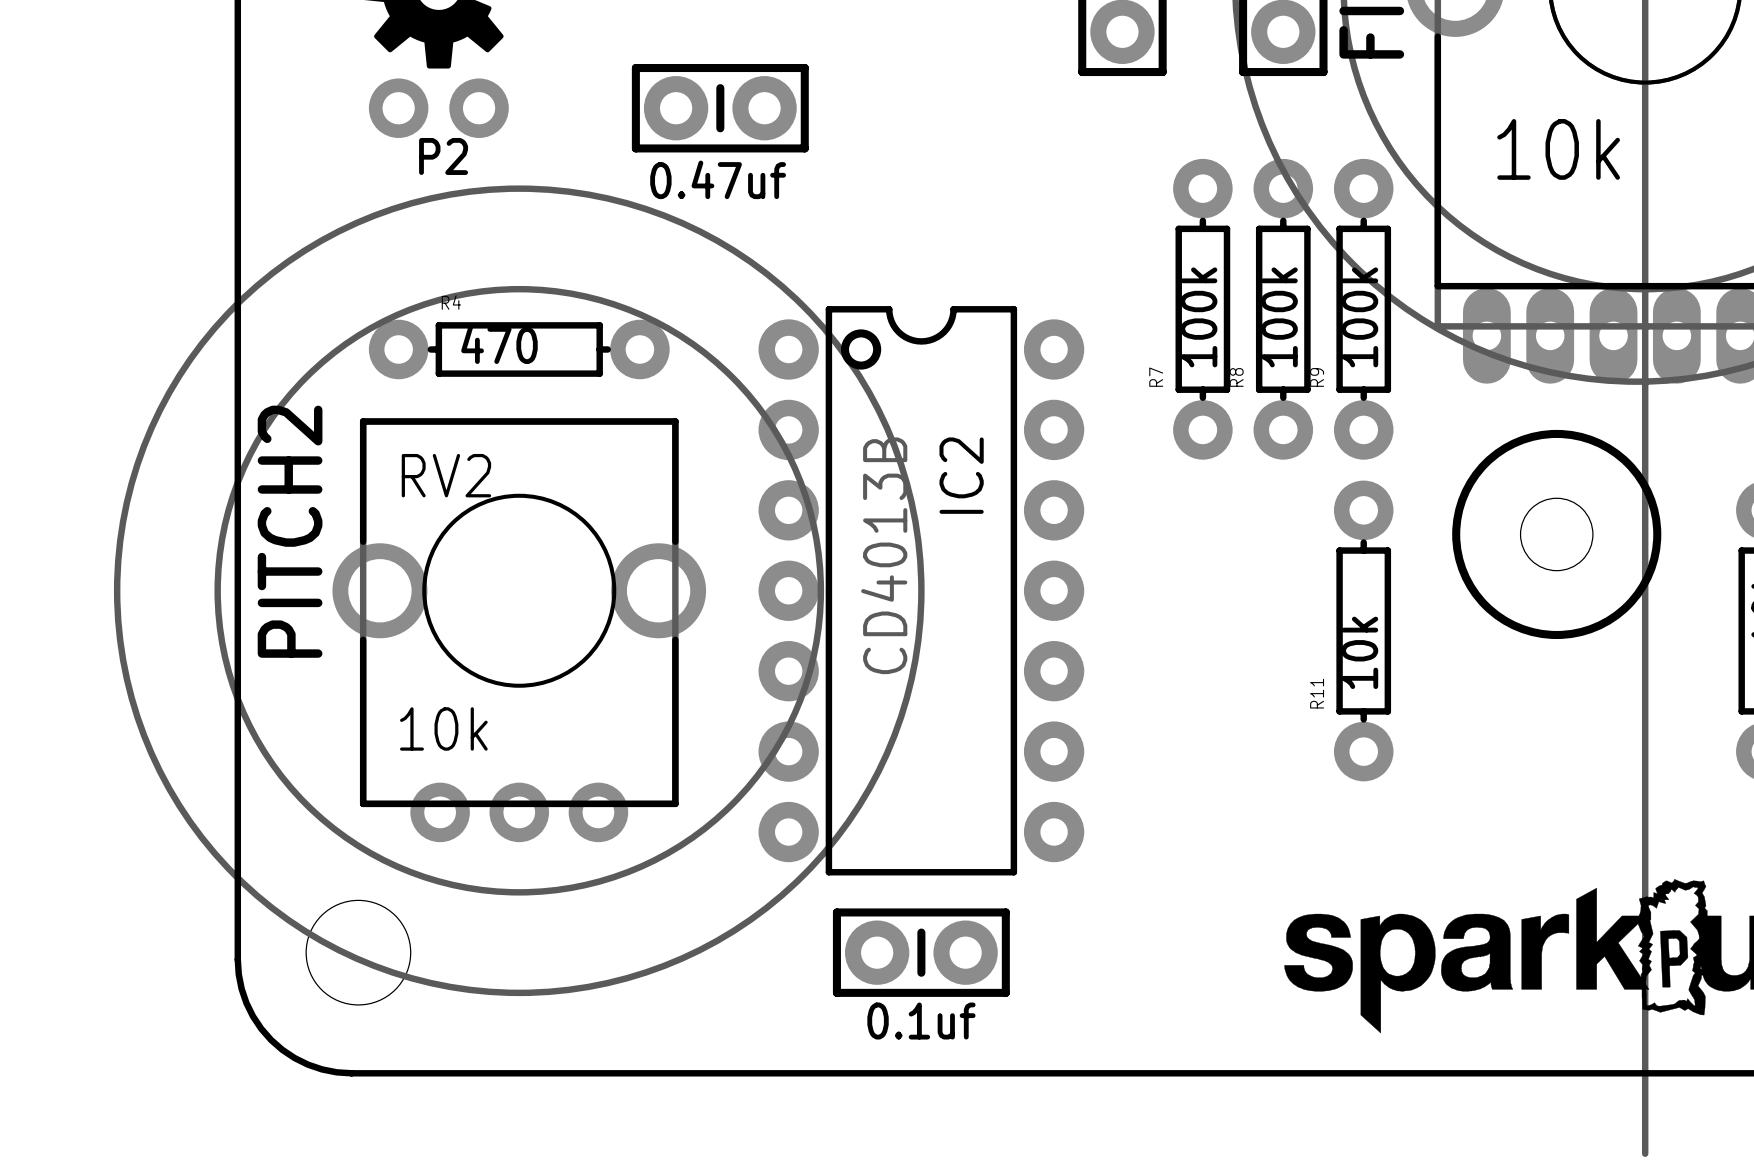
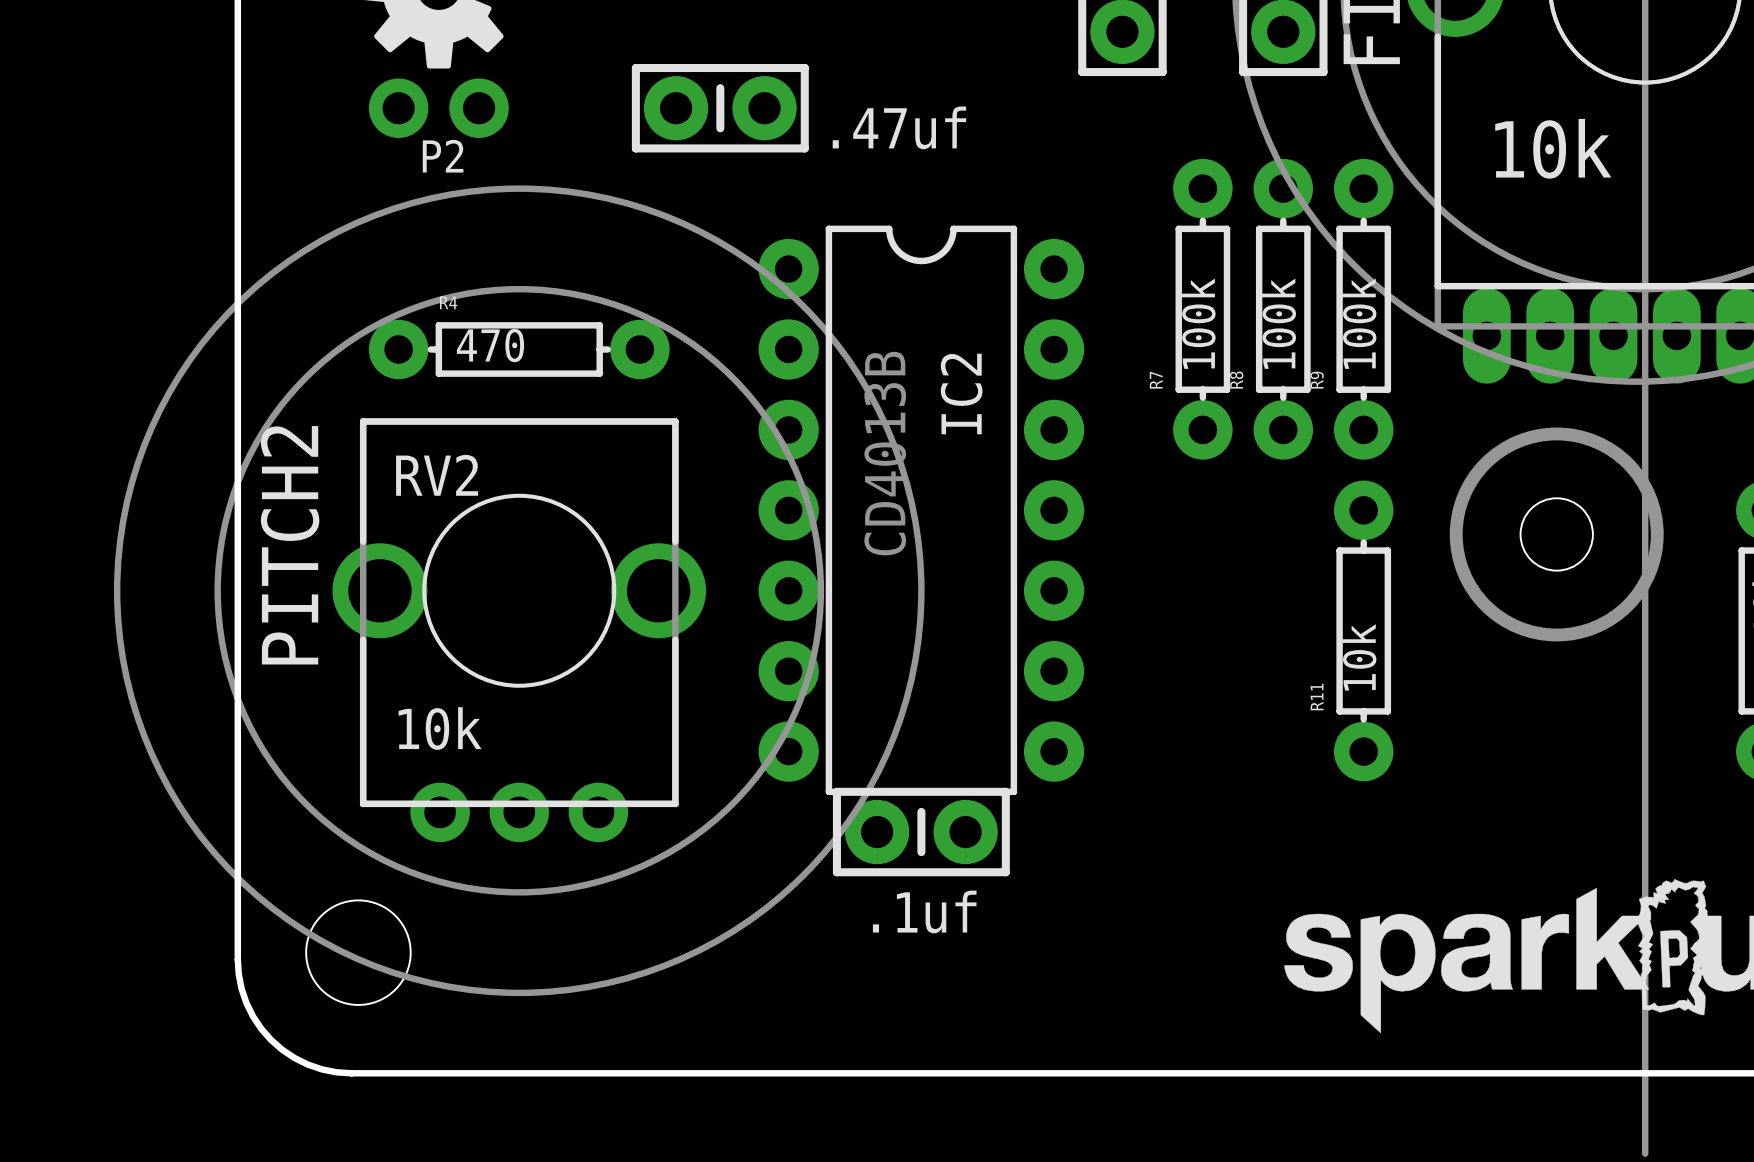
text: 0.47uf (718, 179) -> .47uf (899, 127)
IC2 footprint: [758, 306, 1085, 876] -> [758, 225, 1085, 796]
drawing shape: [1452, 429, 1662, 640] -> [1449, 427, 1664, 642]
text: none -> .1uf (924, 911)
part position: (921, 952) -> (921, 832)
text: 0.1uf (921, 1021) -> none

